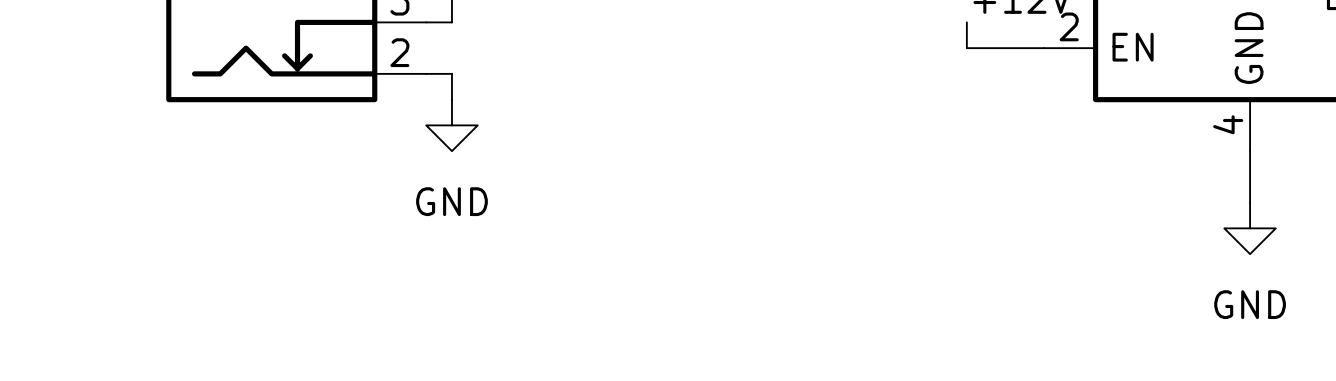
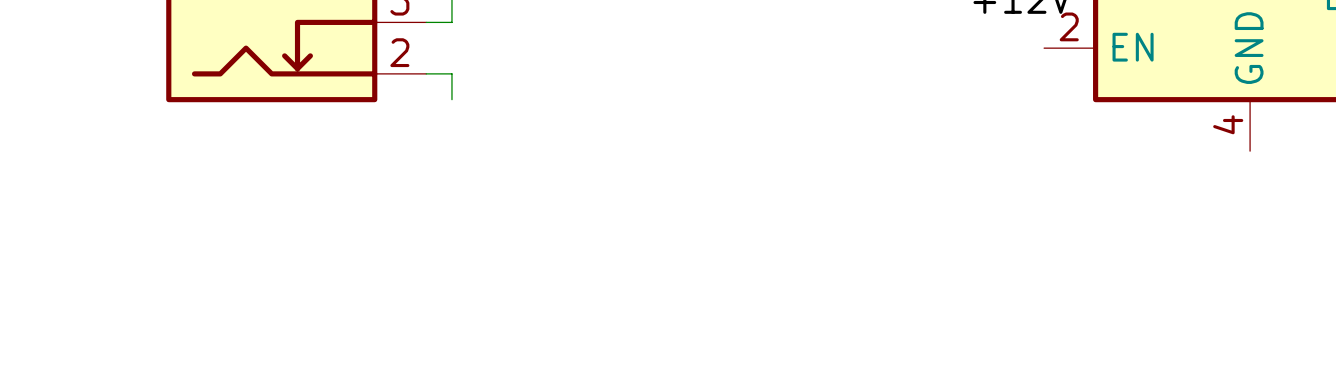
wire: (966, 22) (966, 48) (1044, 48) -> none
power symbol: GND (451, 125) -> none
wire: (1250, 151) (1250, 202) -> none
power symbol: GND (1250, 228) -> none

